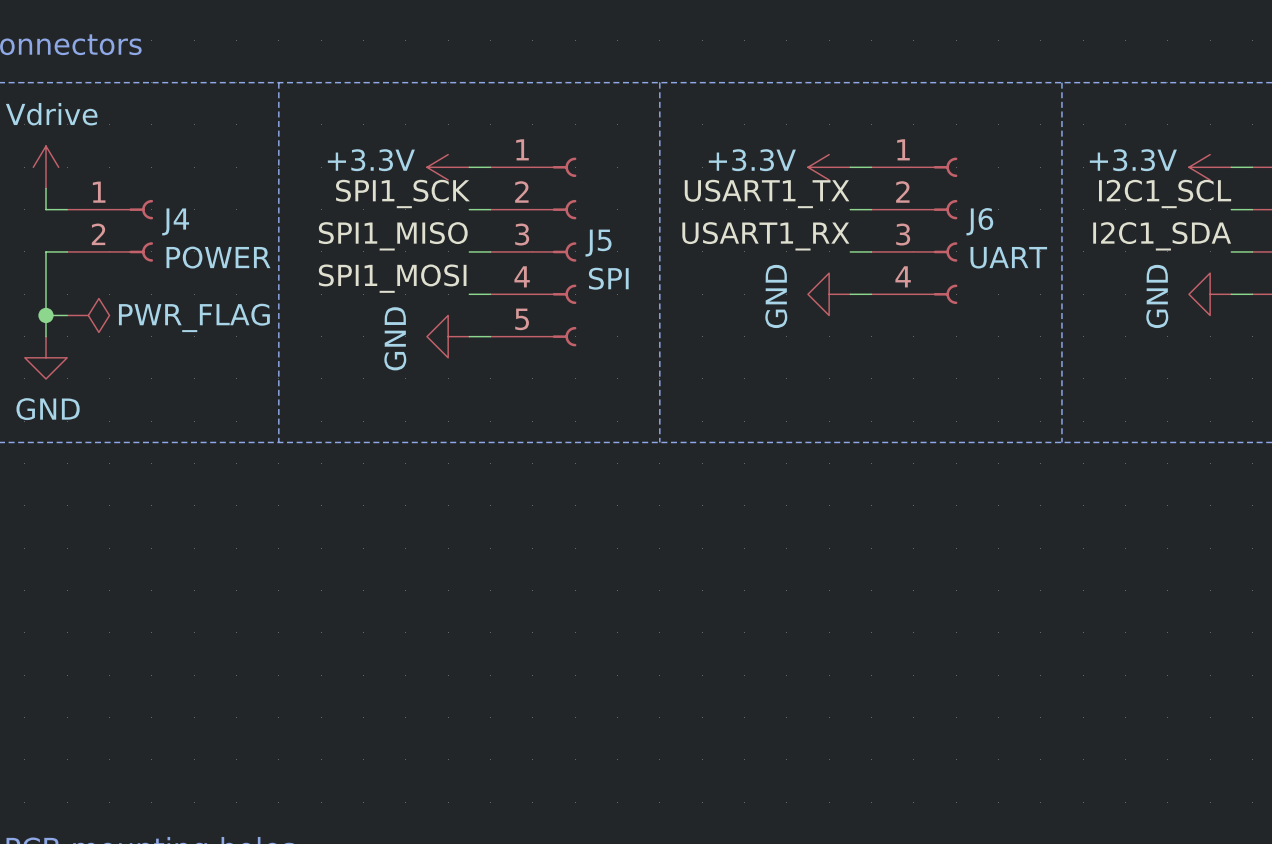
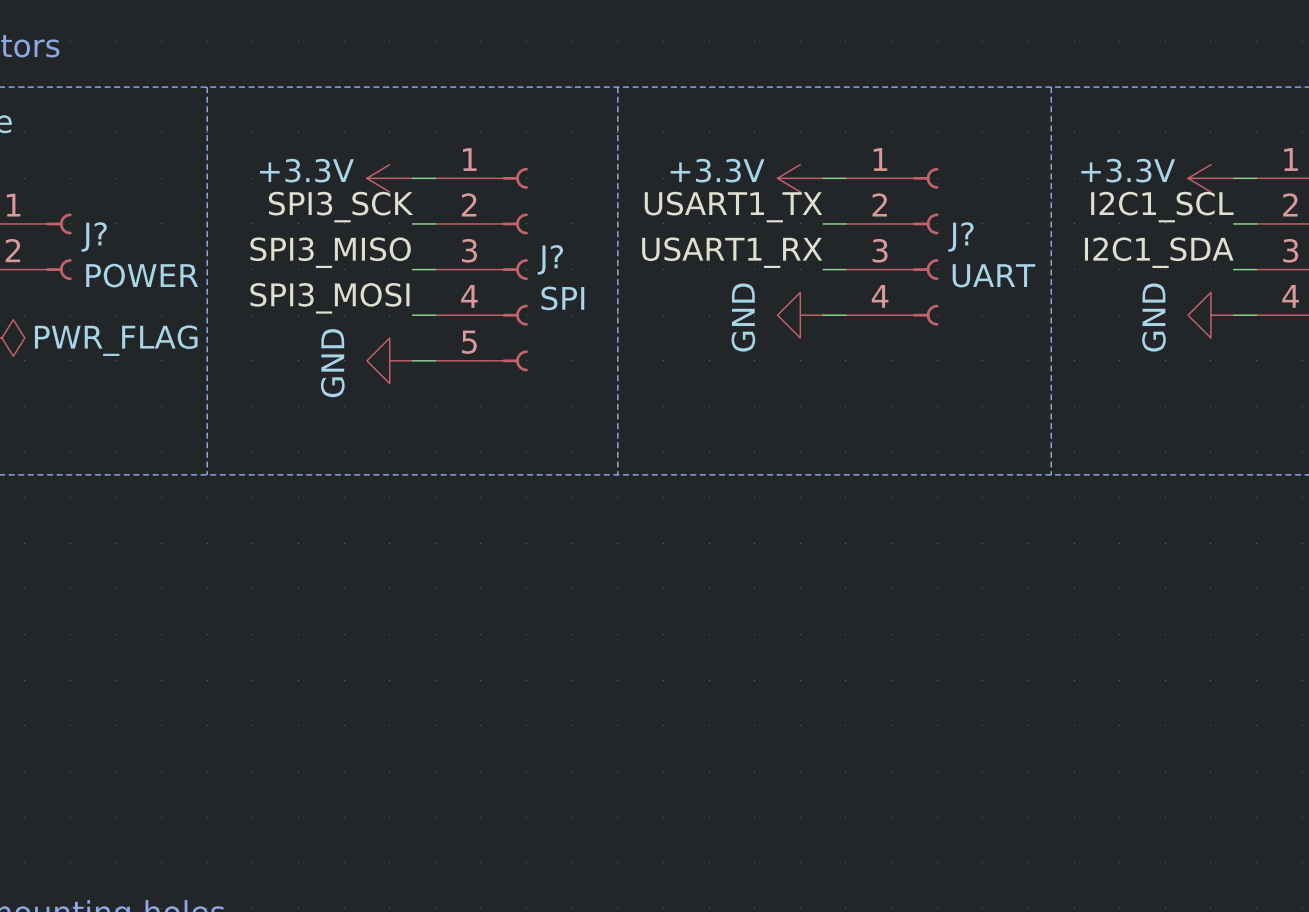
label: SPI1_SCK (402, 193) -> SPI3_SCK (341, 207)
J4 name: J4 (175, 221) -> J? (94, 236)
J6 name: J6 (979, 221) -> J? (960, 236)
label: SPI1_MISO (393, 236) -> SPI3_MISO (330, 252)
J5 name: J5 (598, 243) -> J? (550, 259)
label: SPI1_MOSI (392, 278) -> SPI3_MOSI (329, 298)

